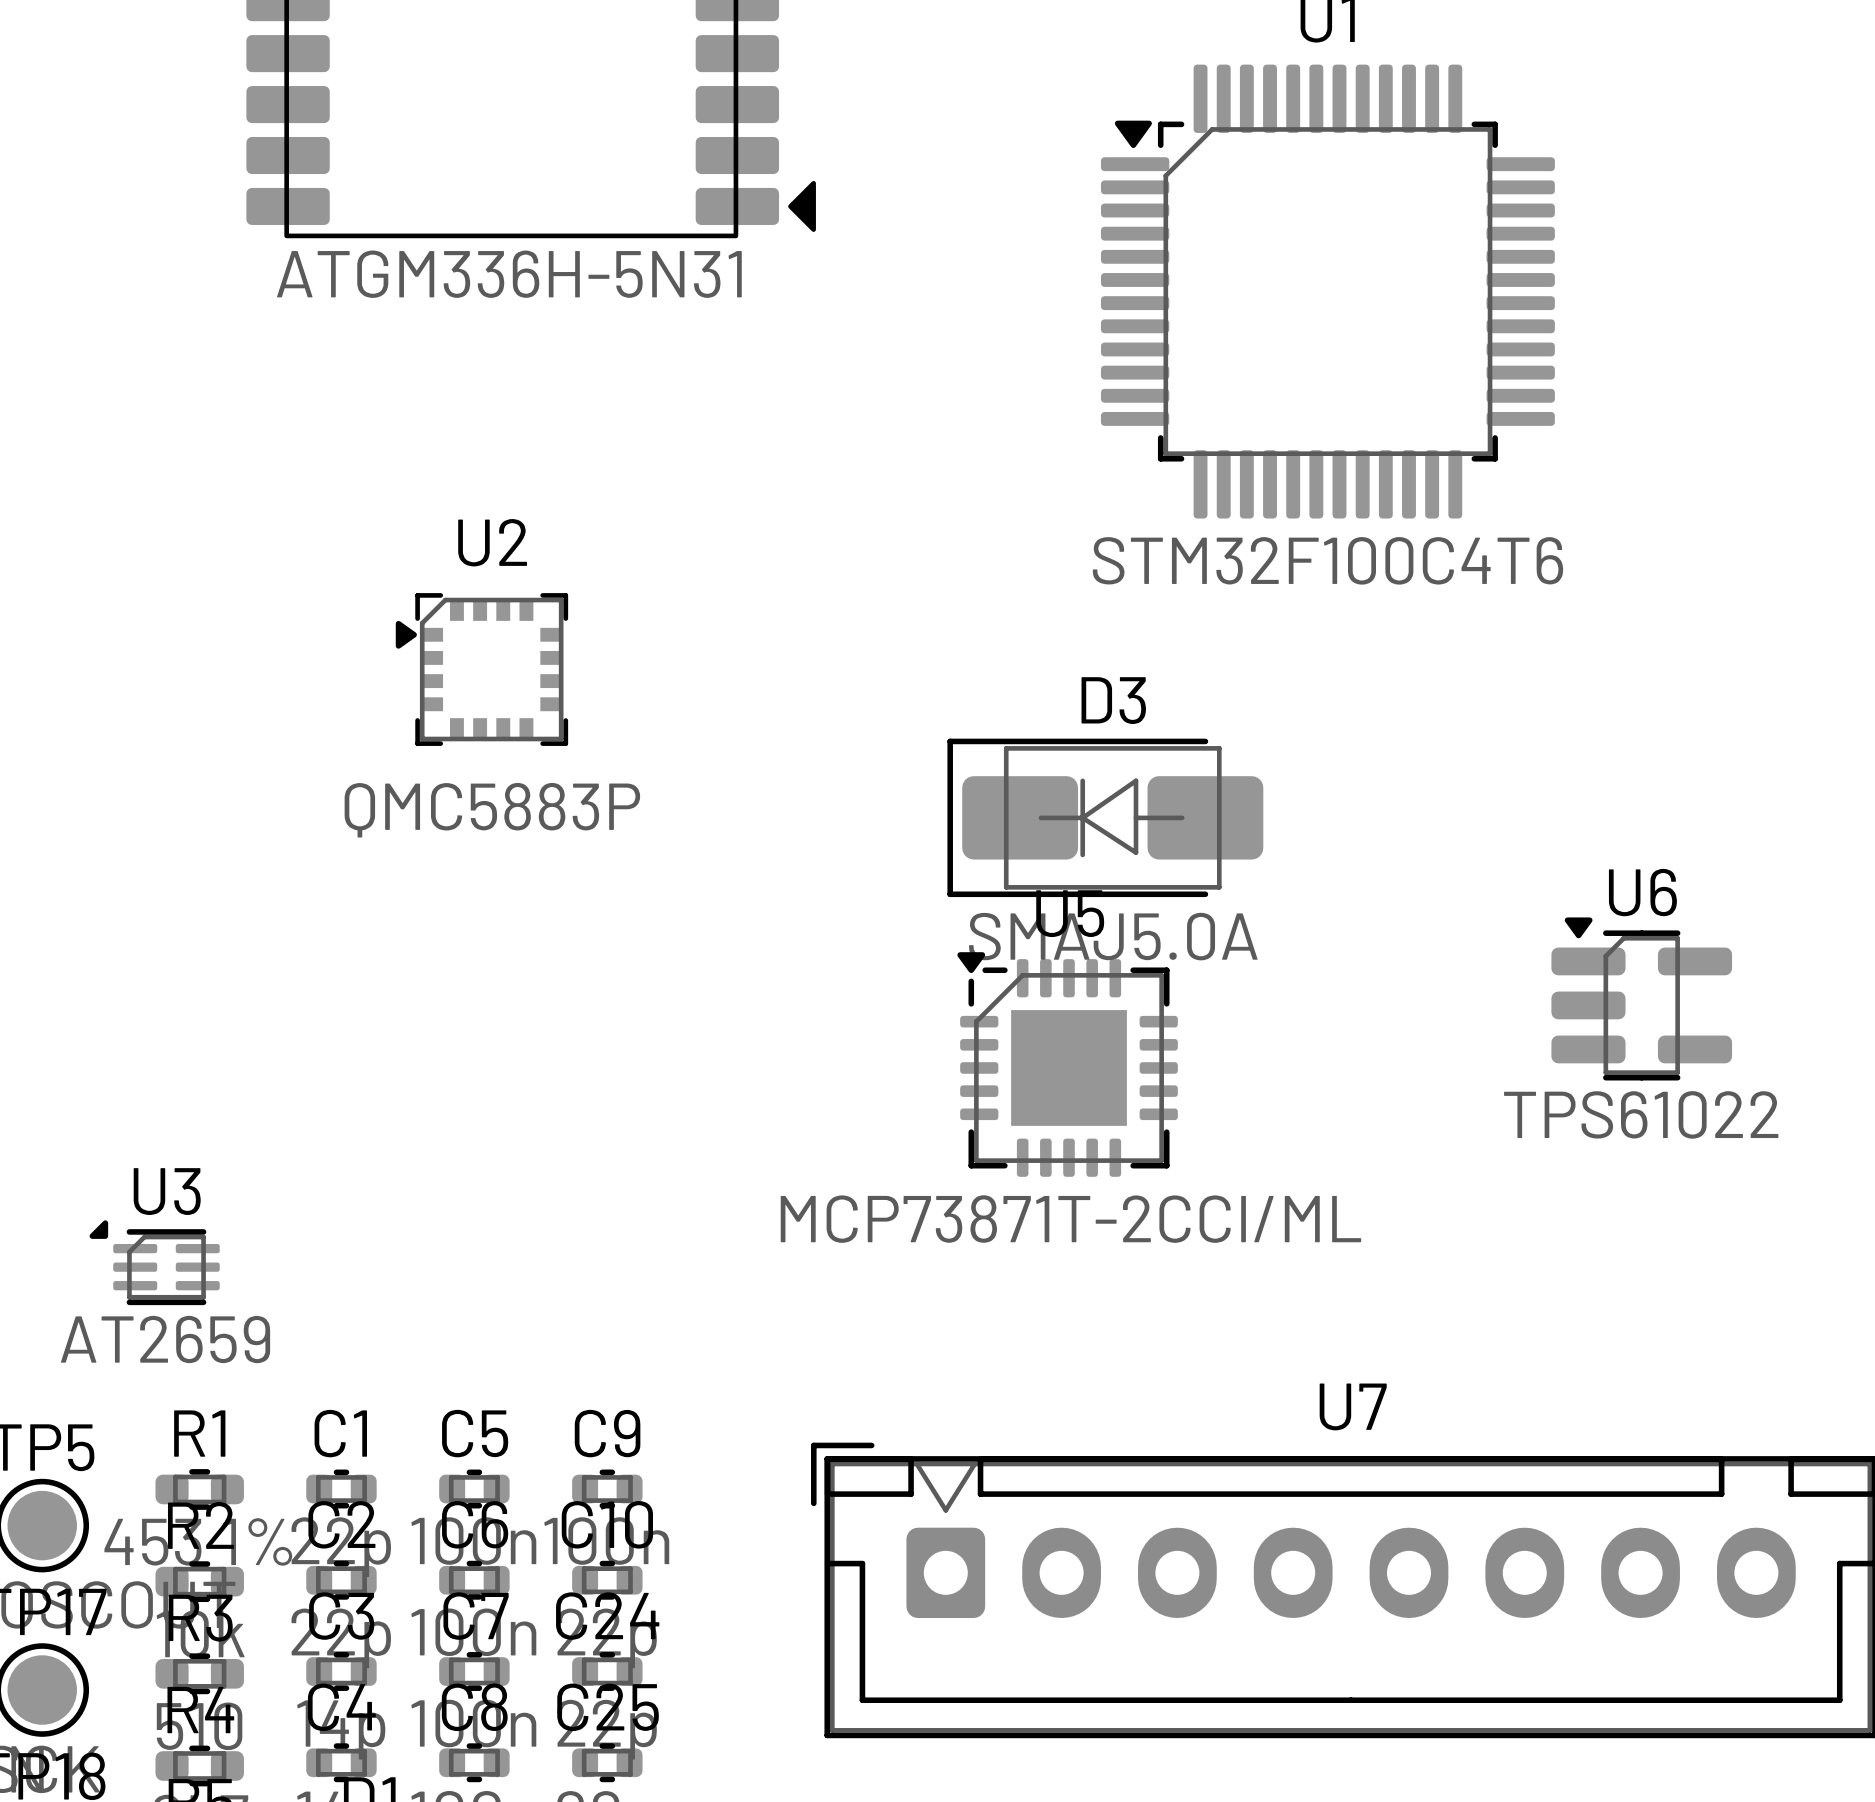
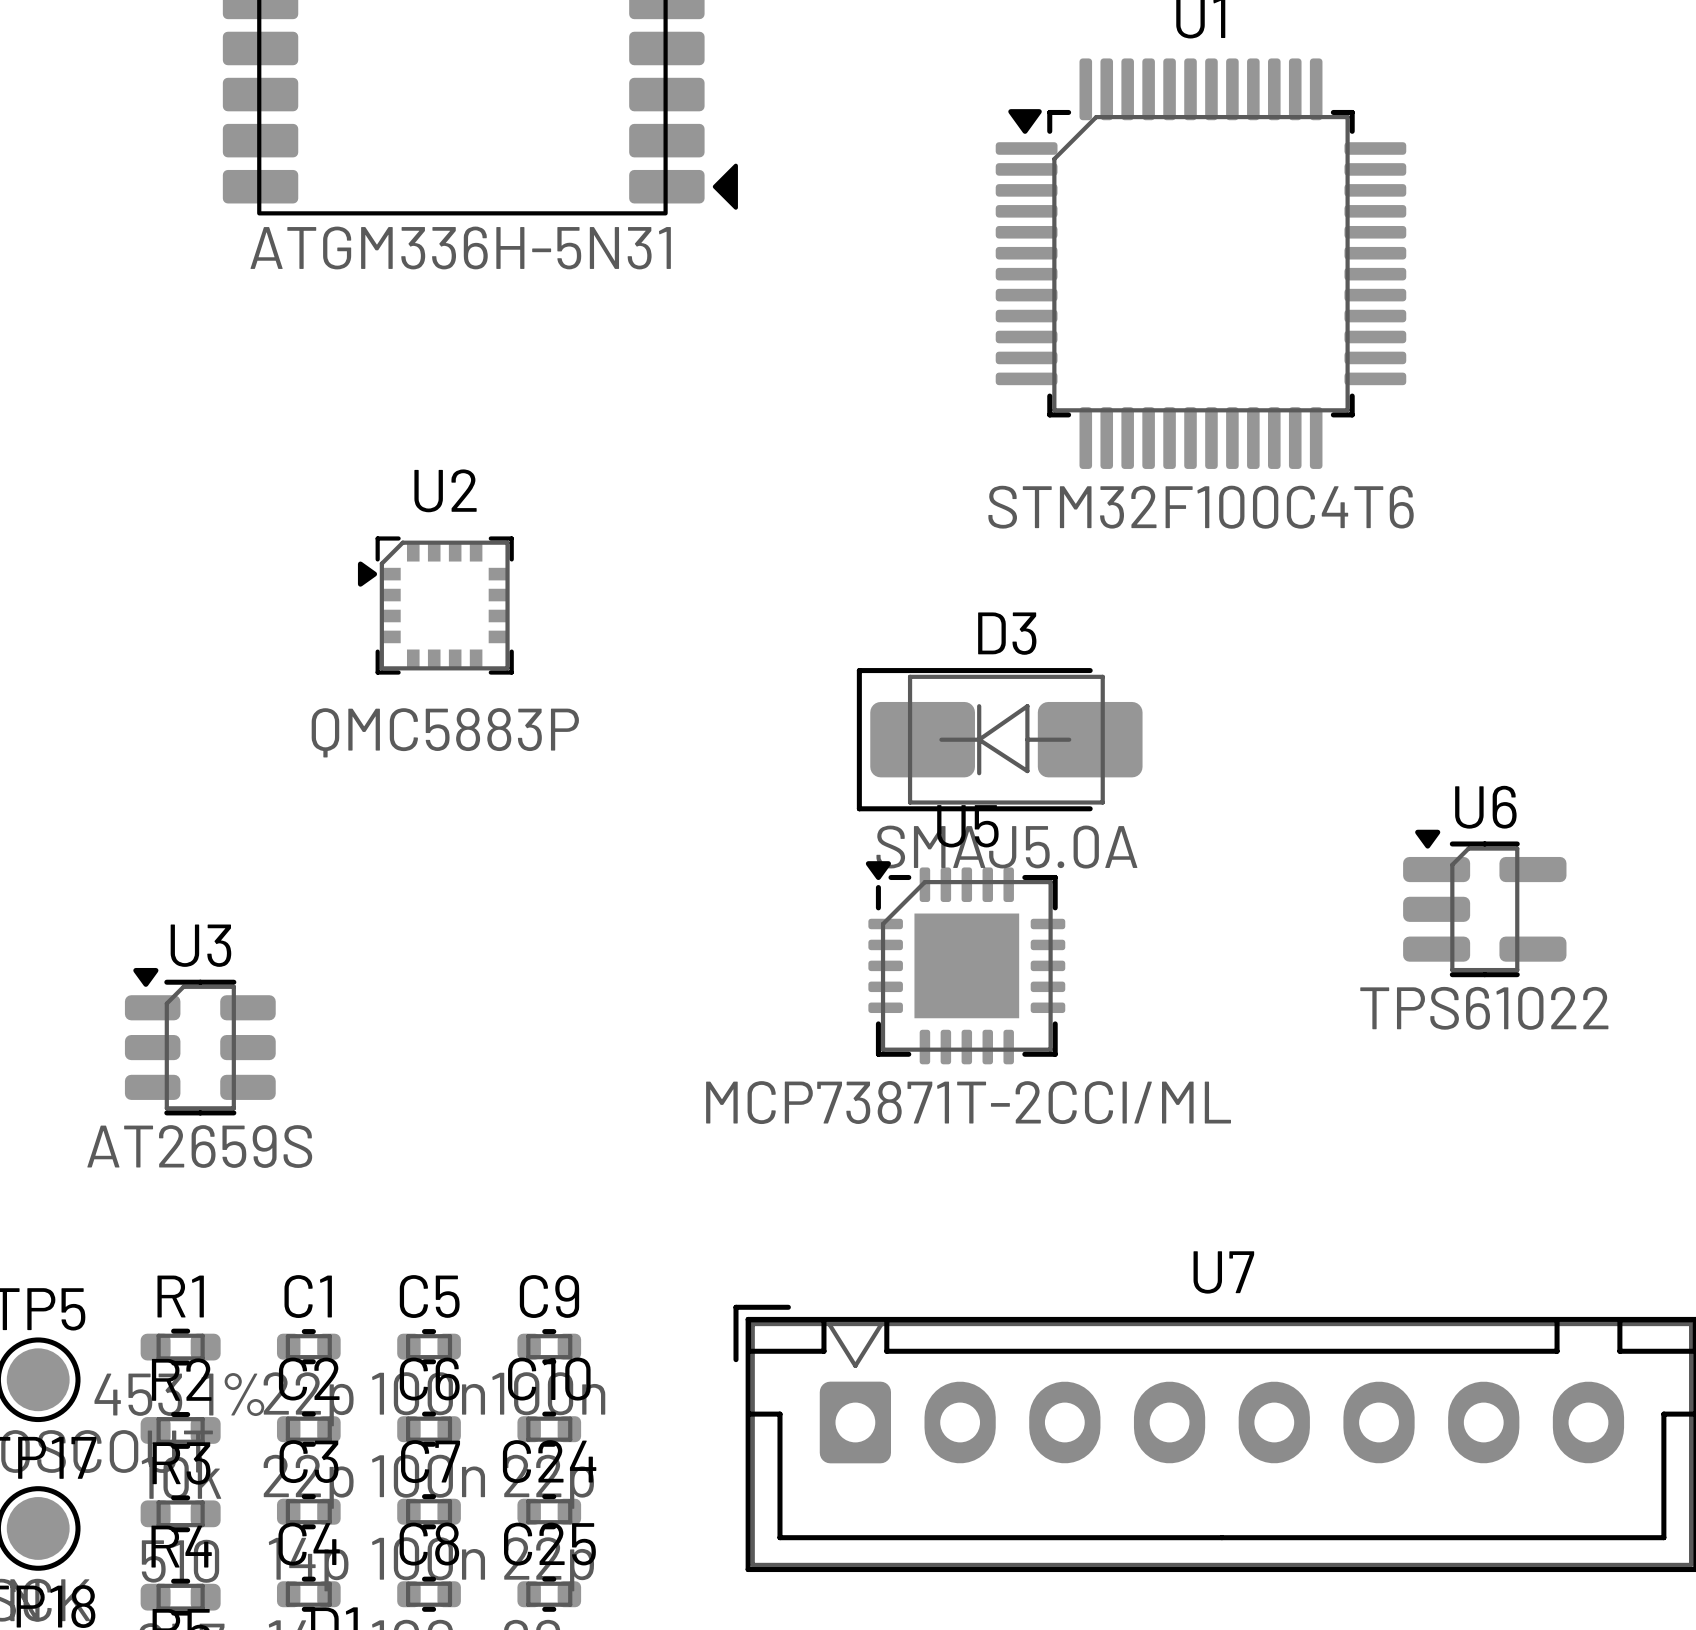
U3 footprint: [89, 1220, 220, 1306] -> [124, 967, 276, 1116]
U3 value: AT2659 (165, 1339) -> AT2659S (199, 1146)

